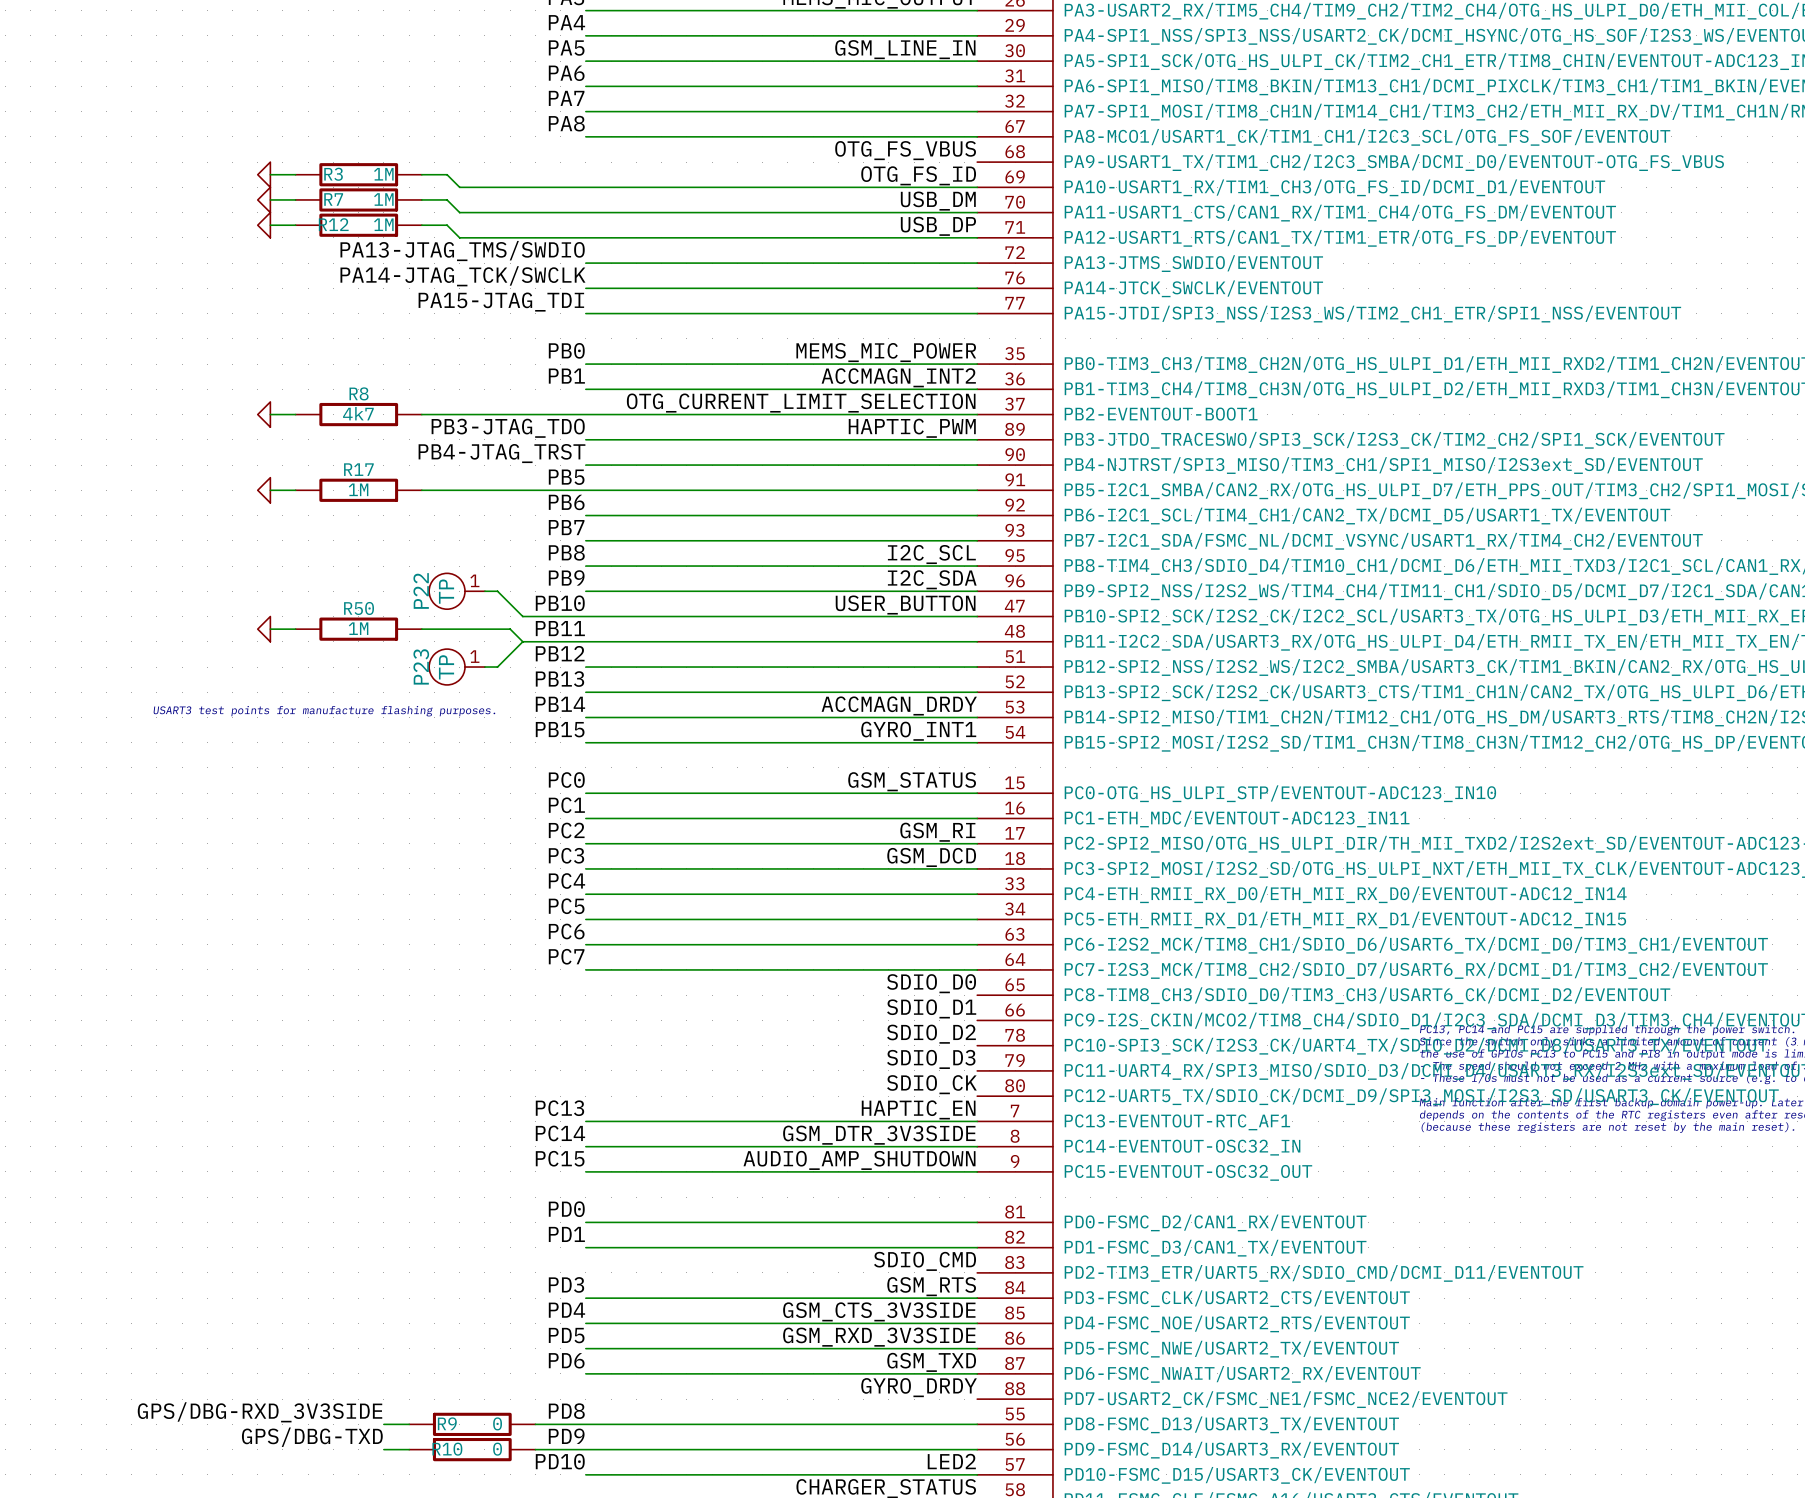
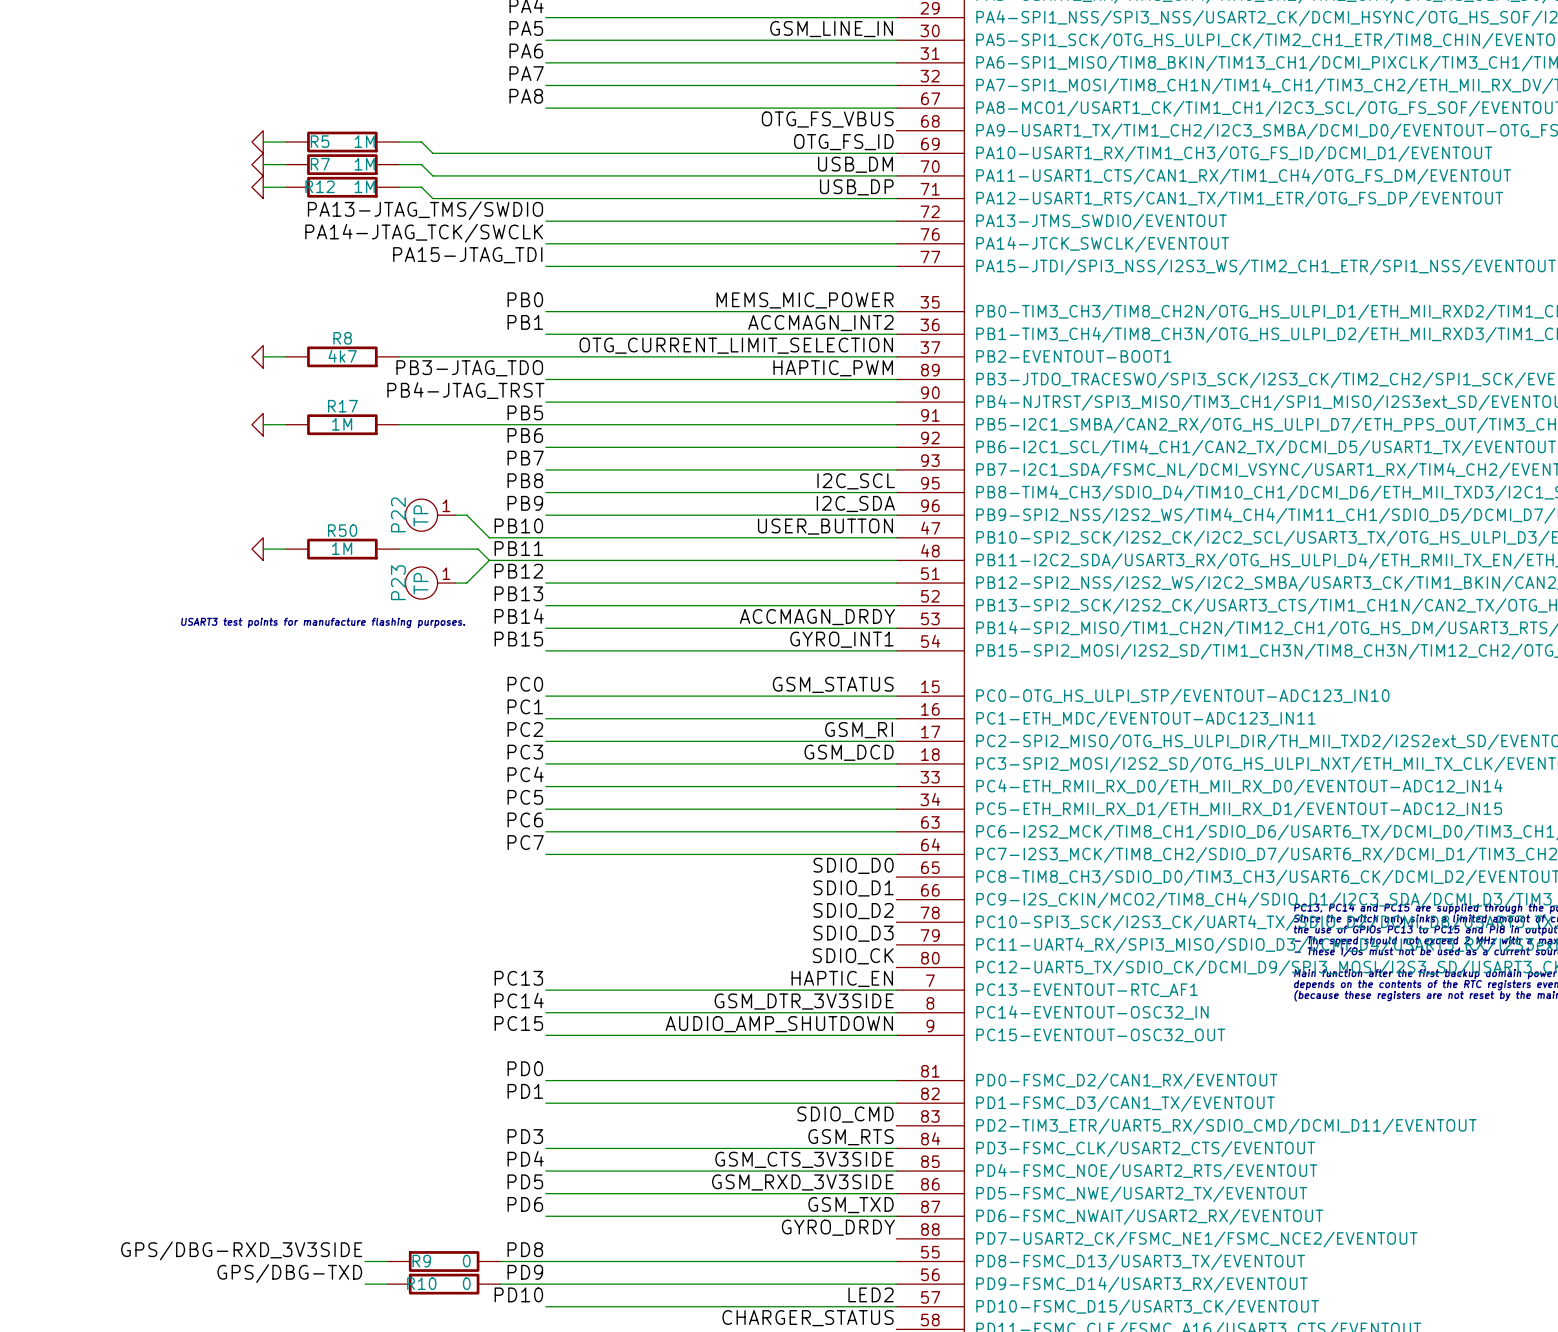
R3 name: R3 (333, 174) -> R5 (320, 141)

